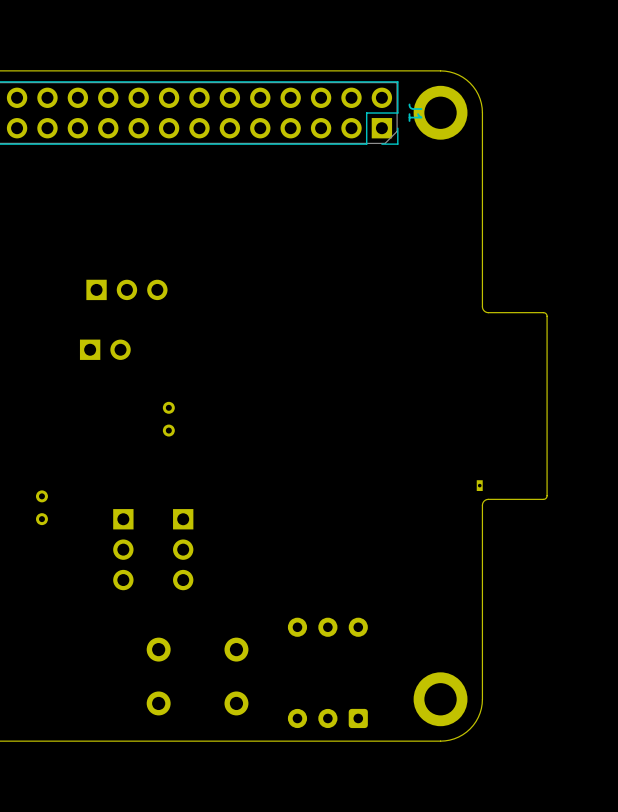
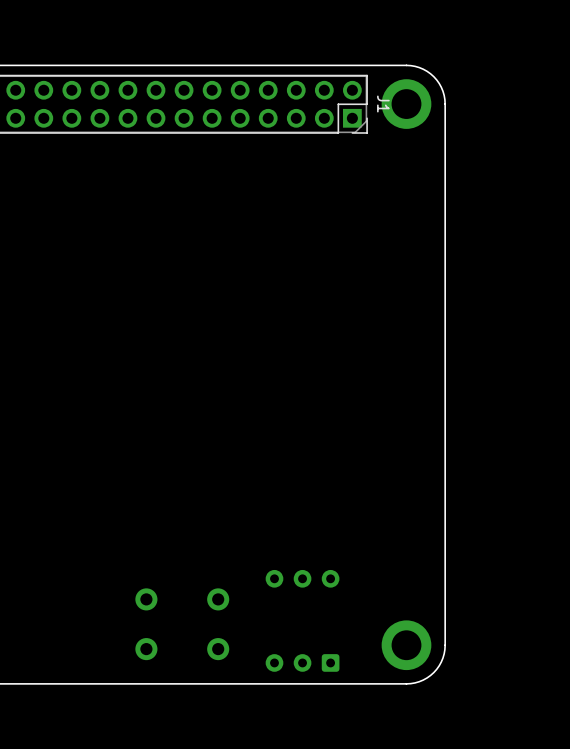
part: (126, 289) -> none
board edge: (482, 306) (487, 312) (543, 312) (547, 316) (546, 497) (543, 499) (487, 499) (482, 505) -> (445, 282) (445, 466)
part: (105, 349) -> none
part: (168, 419) -> none
part: (479, 485) -> none
part: (41, 507) -> none
part: (123, 549) -> none
part: (183, 549) -> none

